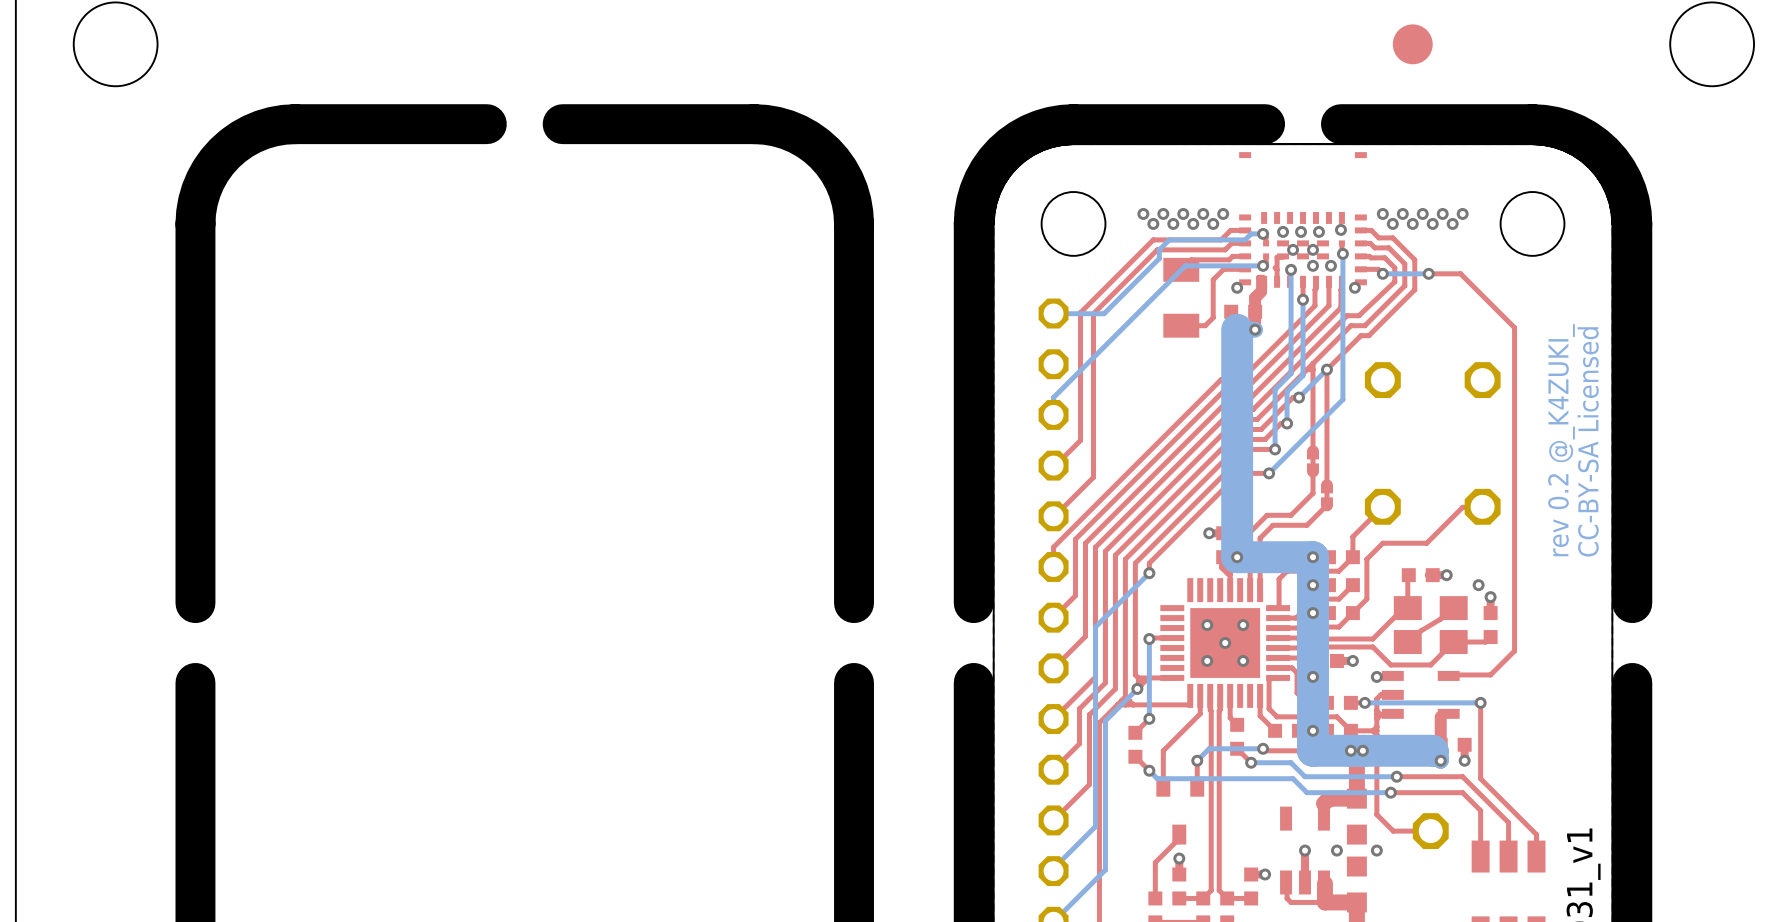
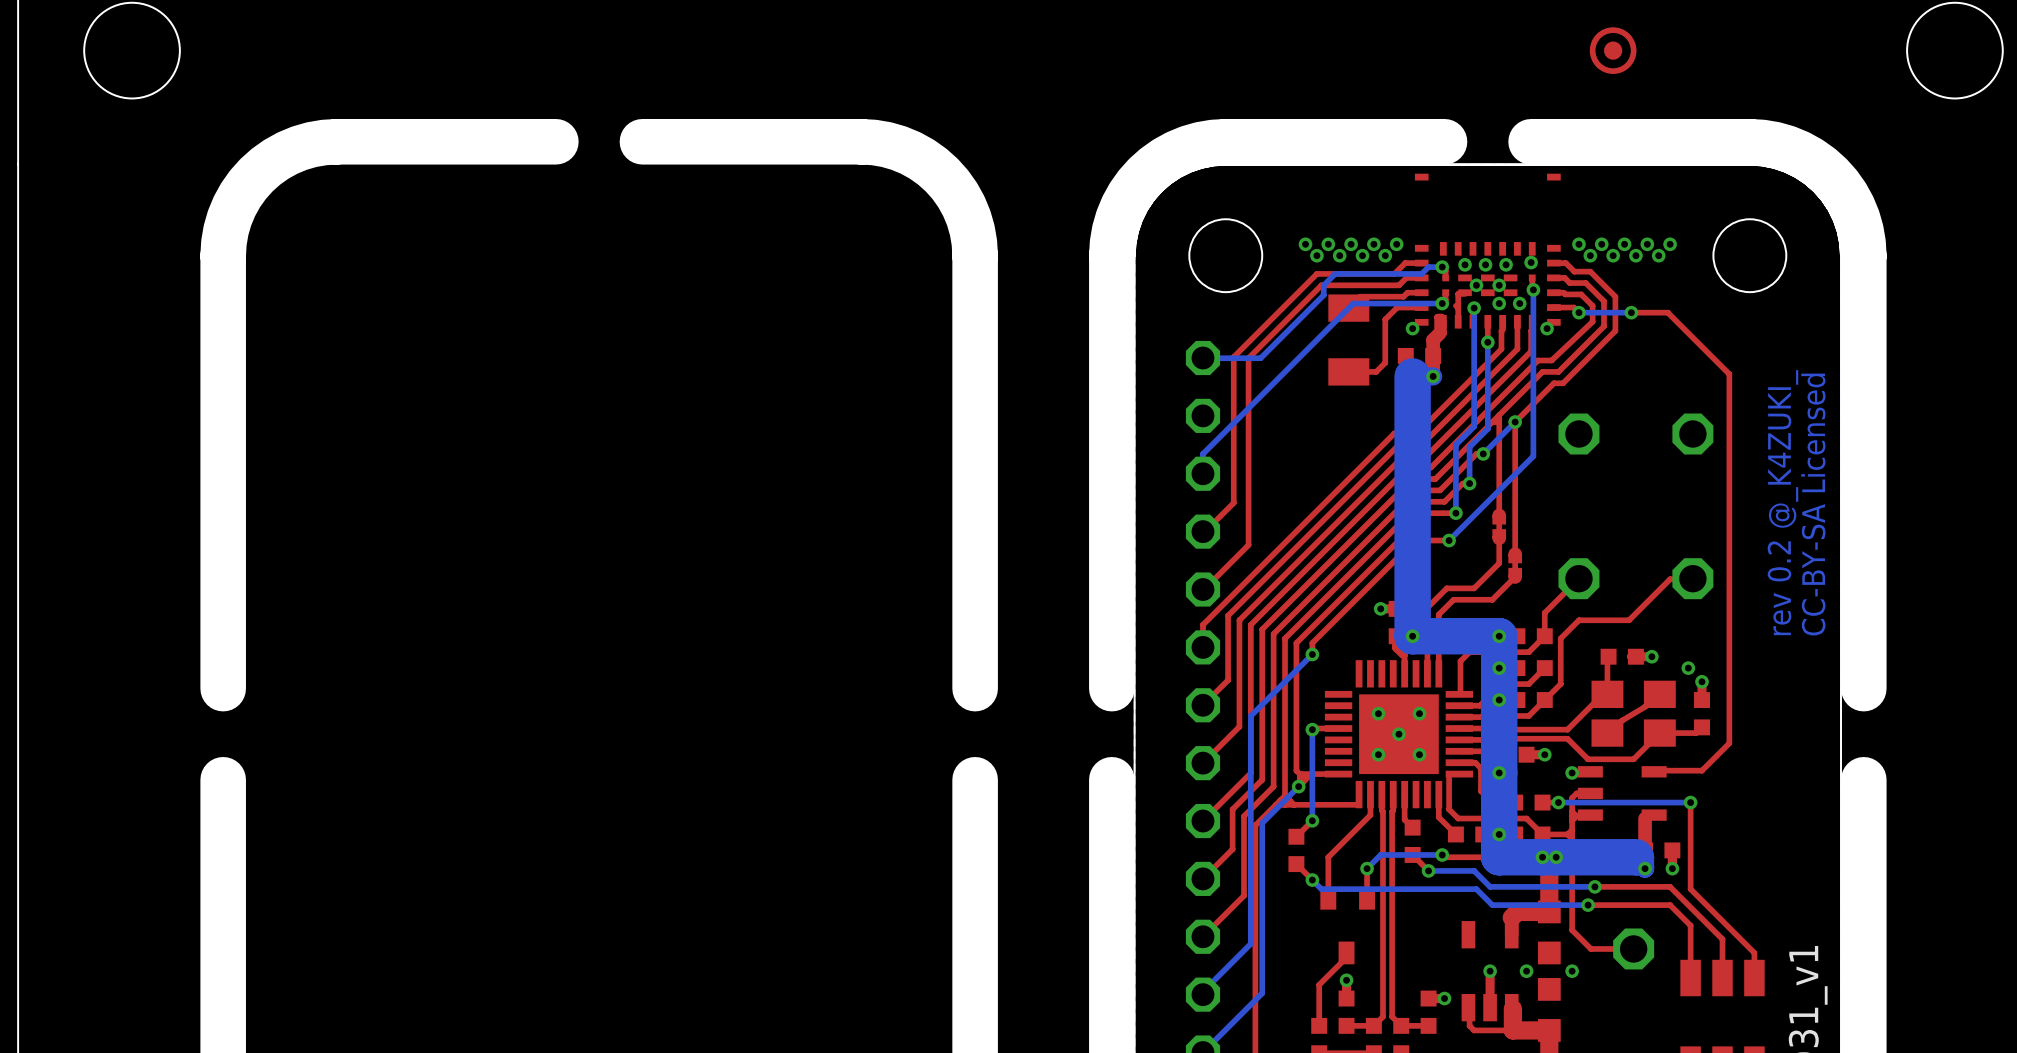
drawing: none -> [1589, 27, 1637, 74]
part footprint: [1392, 24, 1433, 65] -> [1604, 41, 1623, 60]

